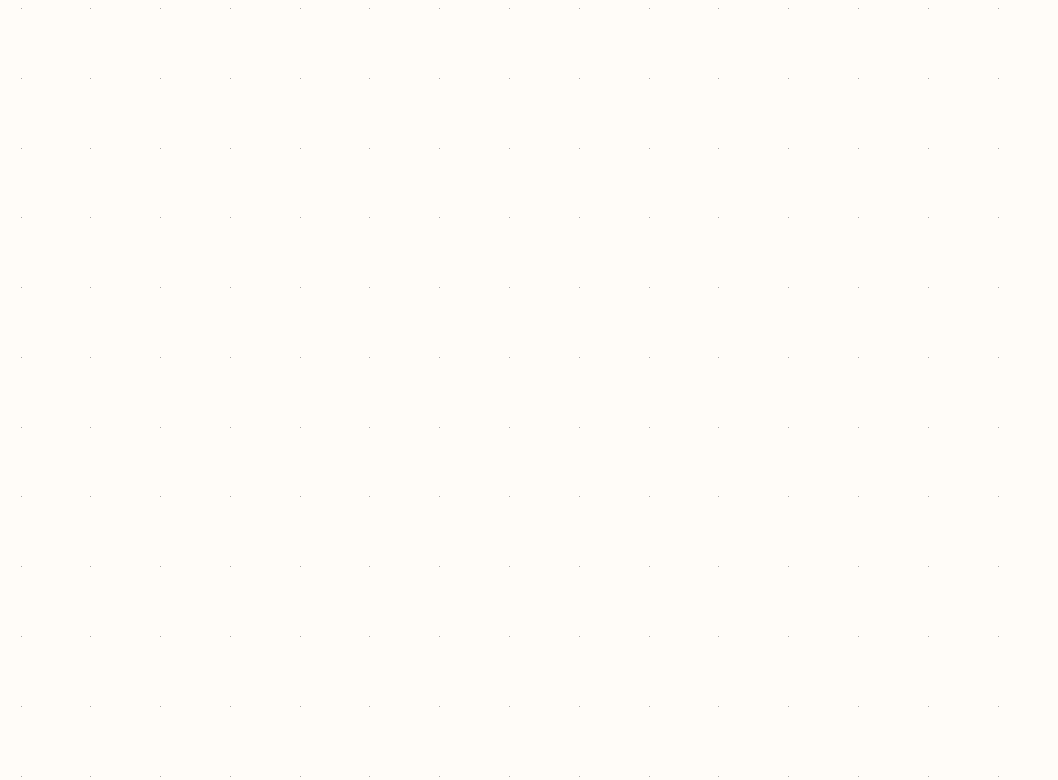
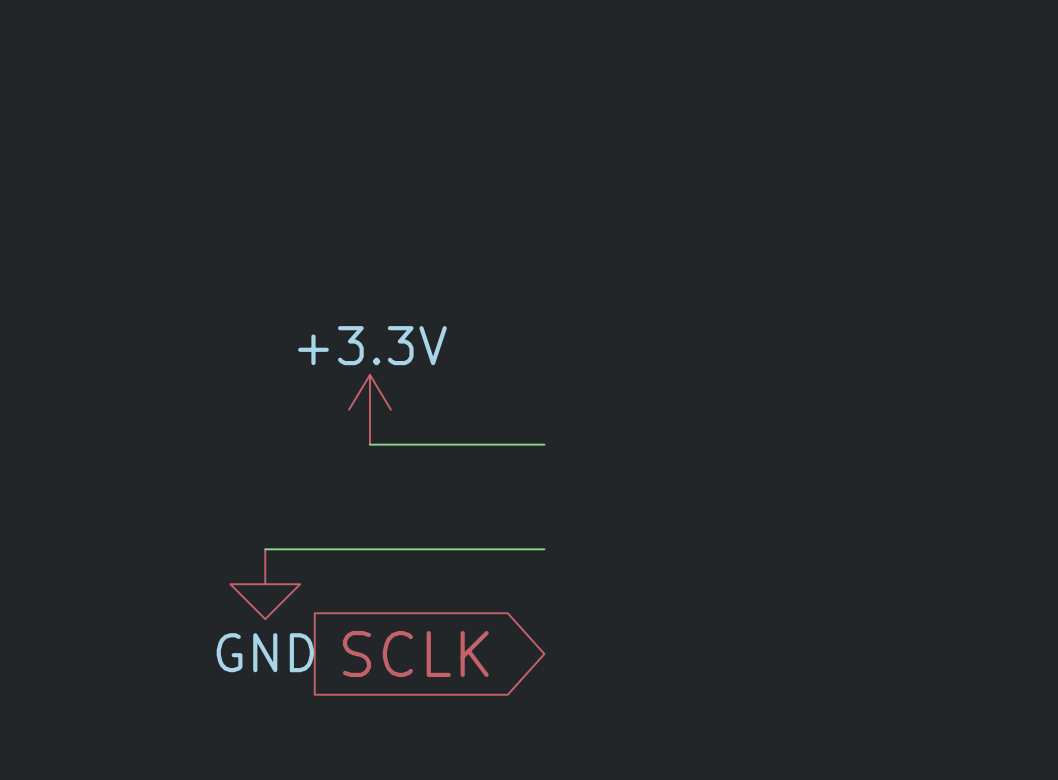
power symbol: none -> +3.3V (369, 409)
wire: none -> (369, 444) (544, 444)
wire: none -> (265, 549) (544, 549)
power symbol: none -> GND (265, 584)
global label: none -> SCLK (415, 654)

